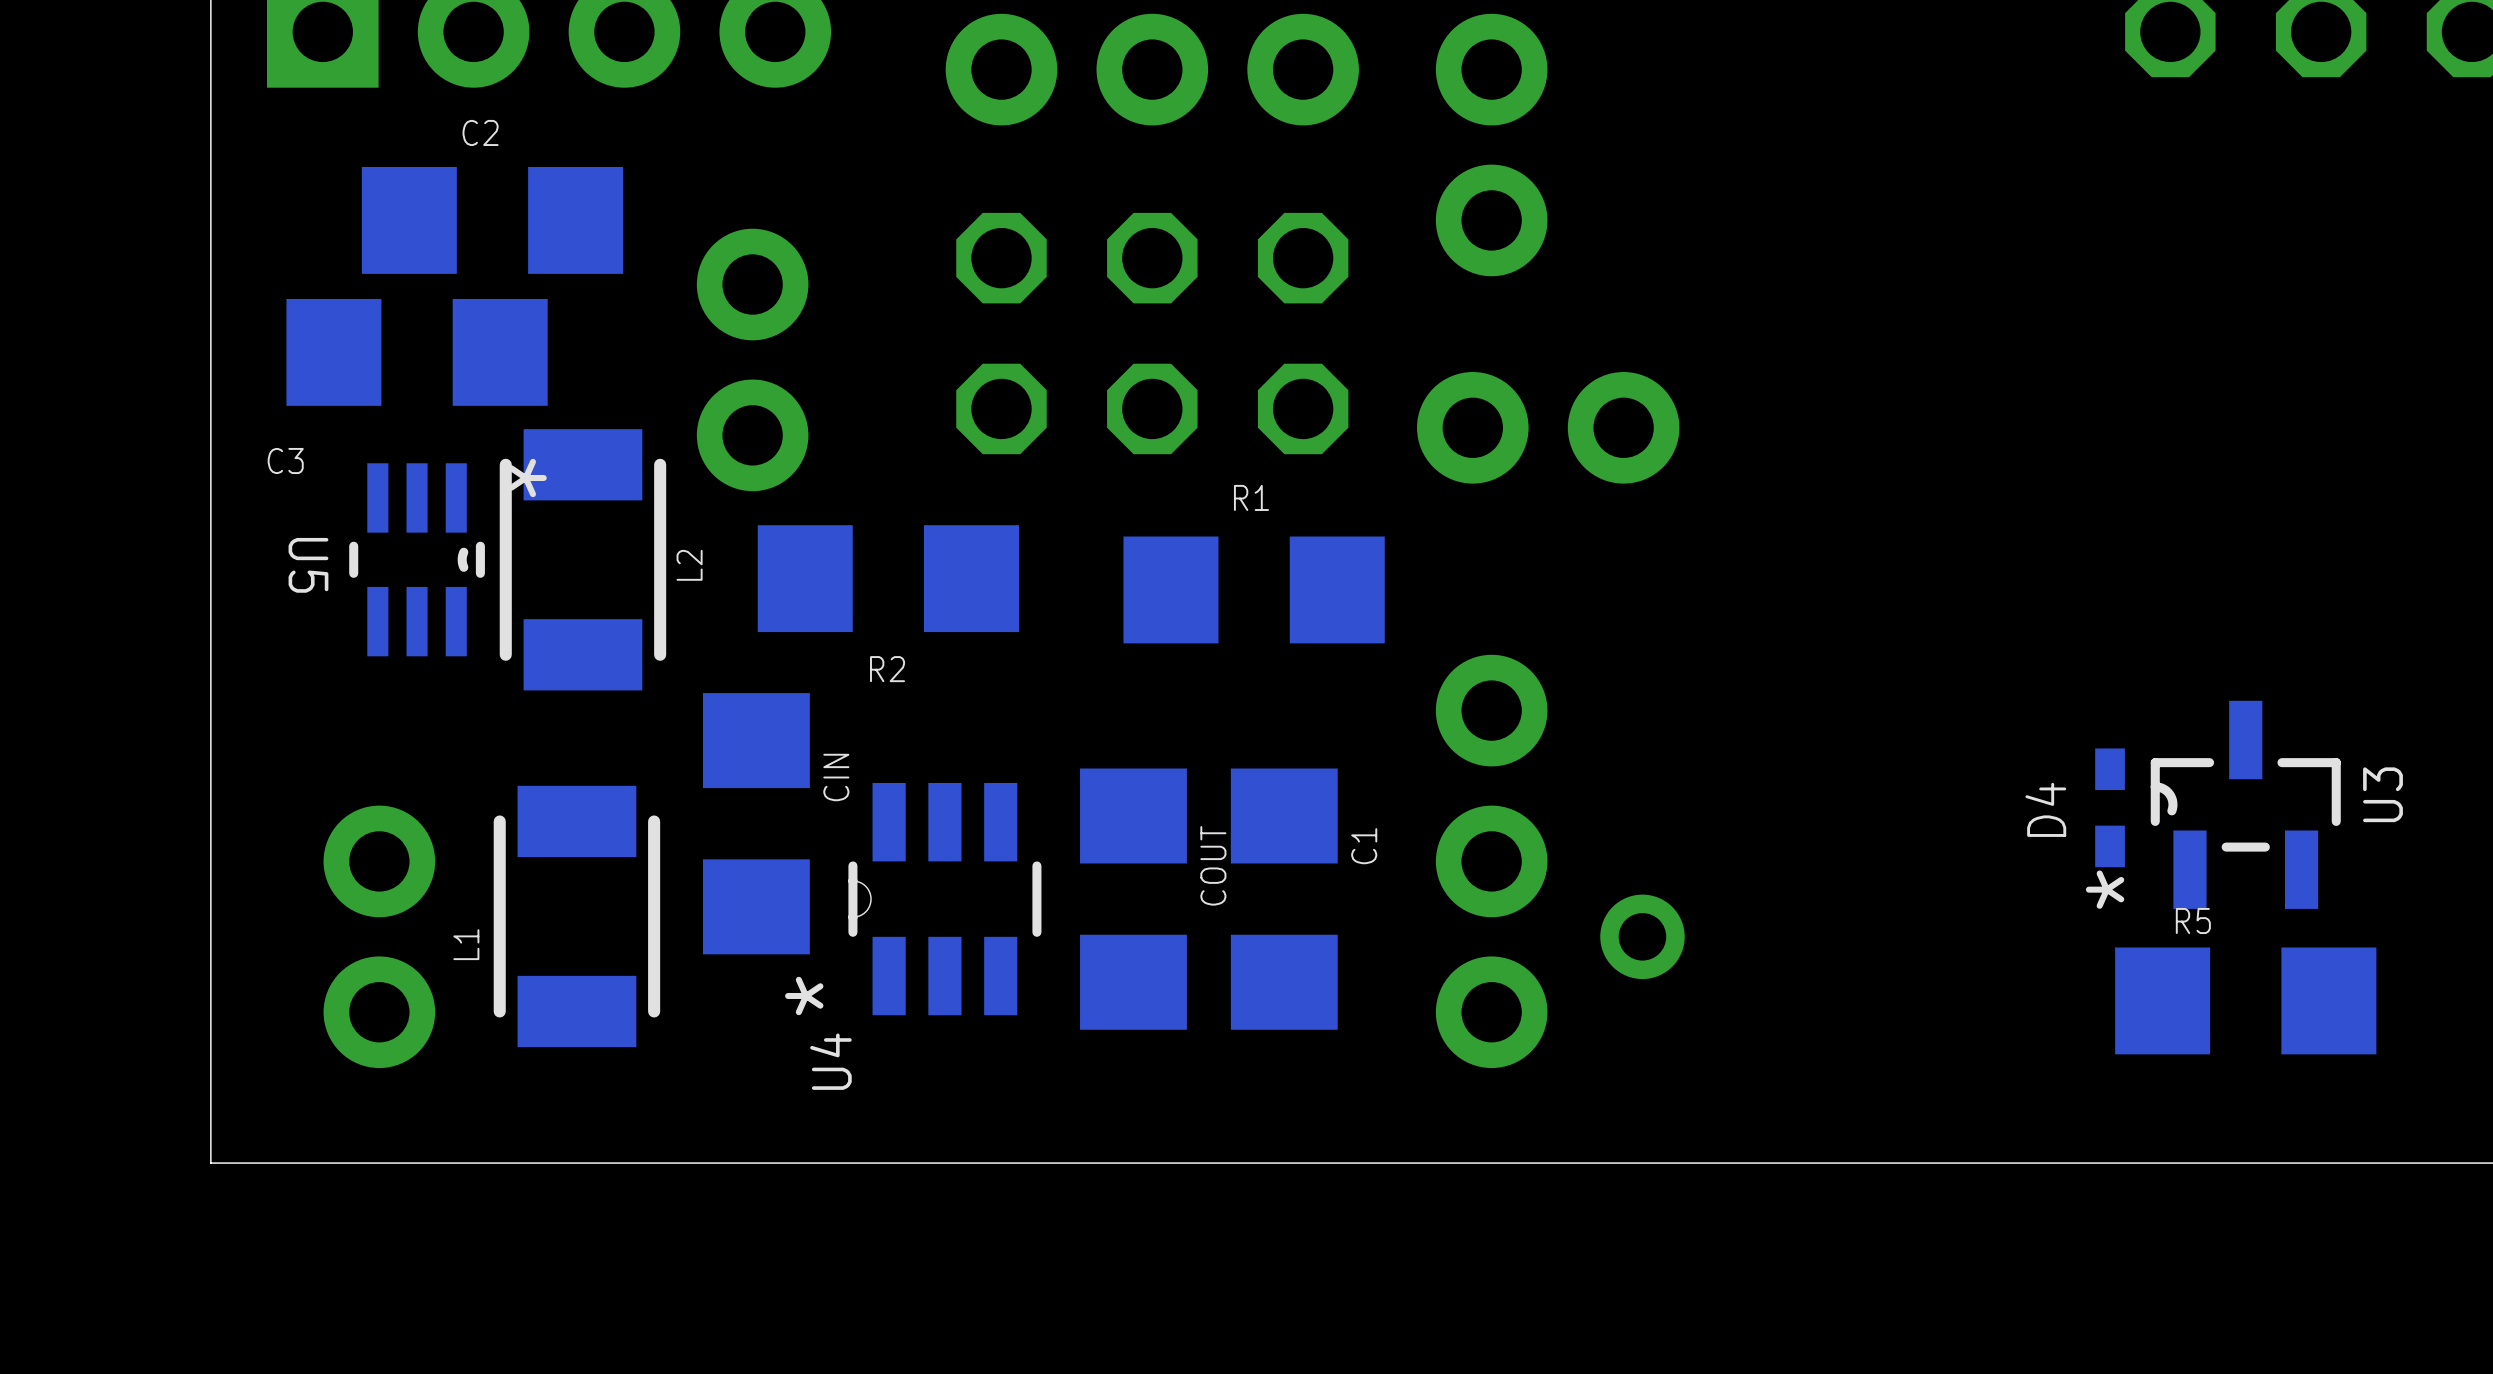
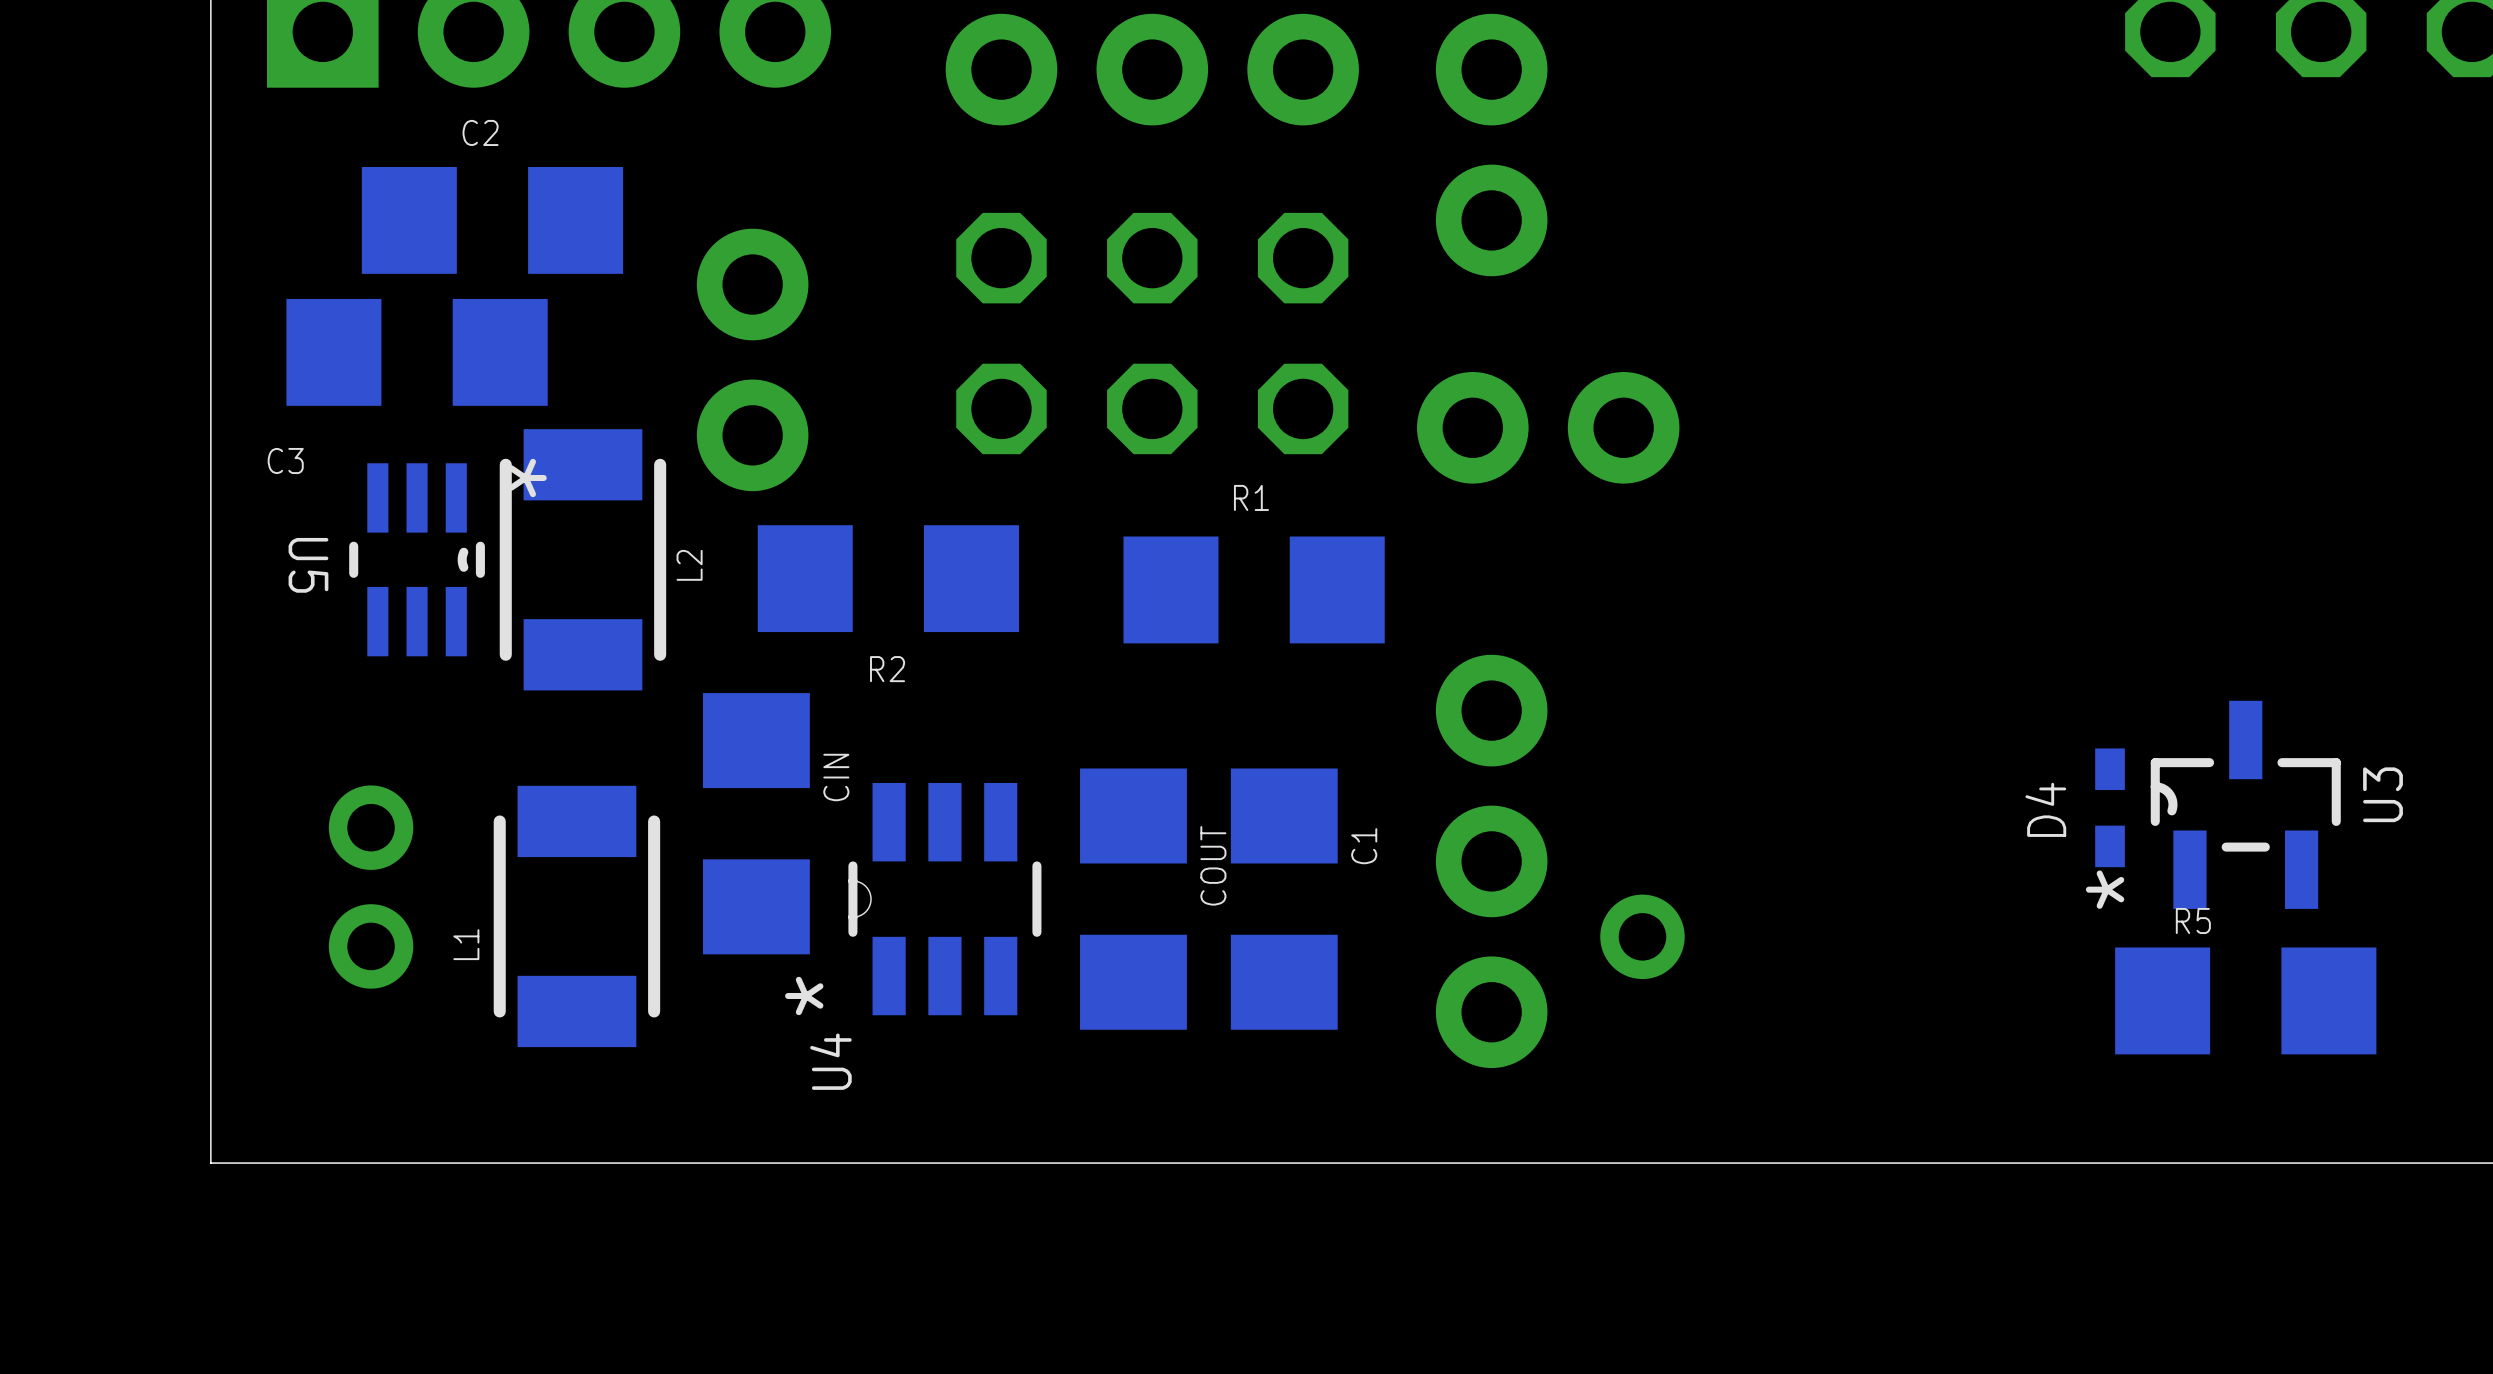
part footprint: [323, 805, 436, 1069] -> [328, 785, 414, 989]

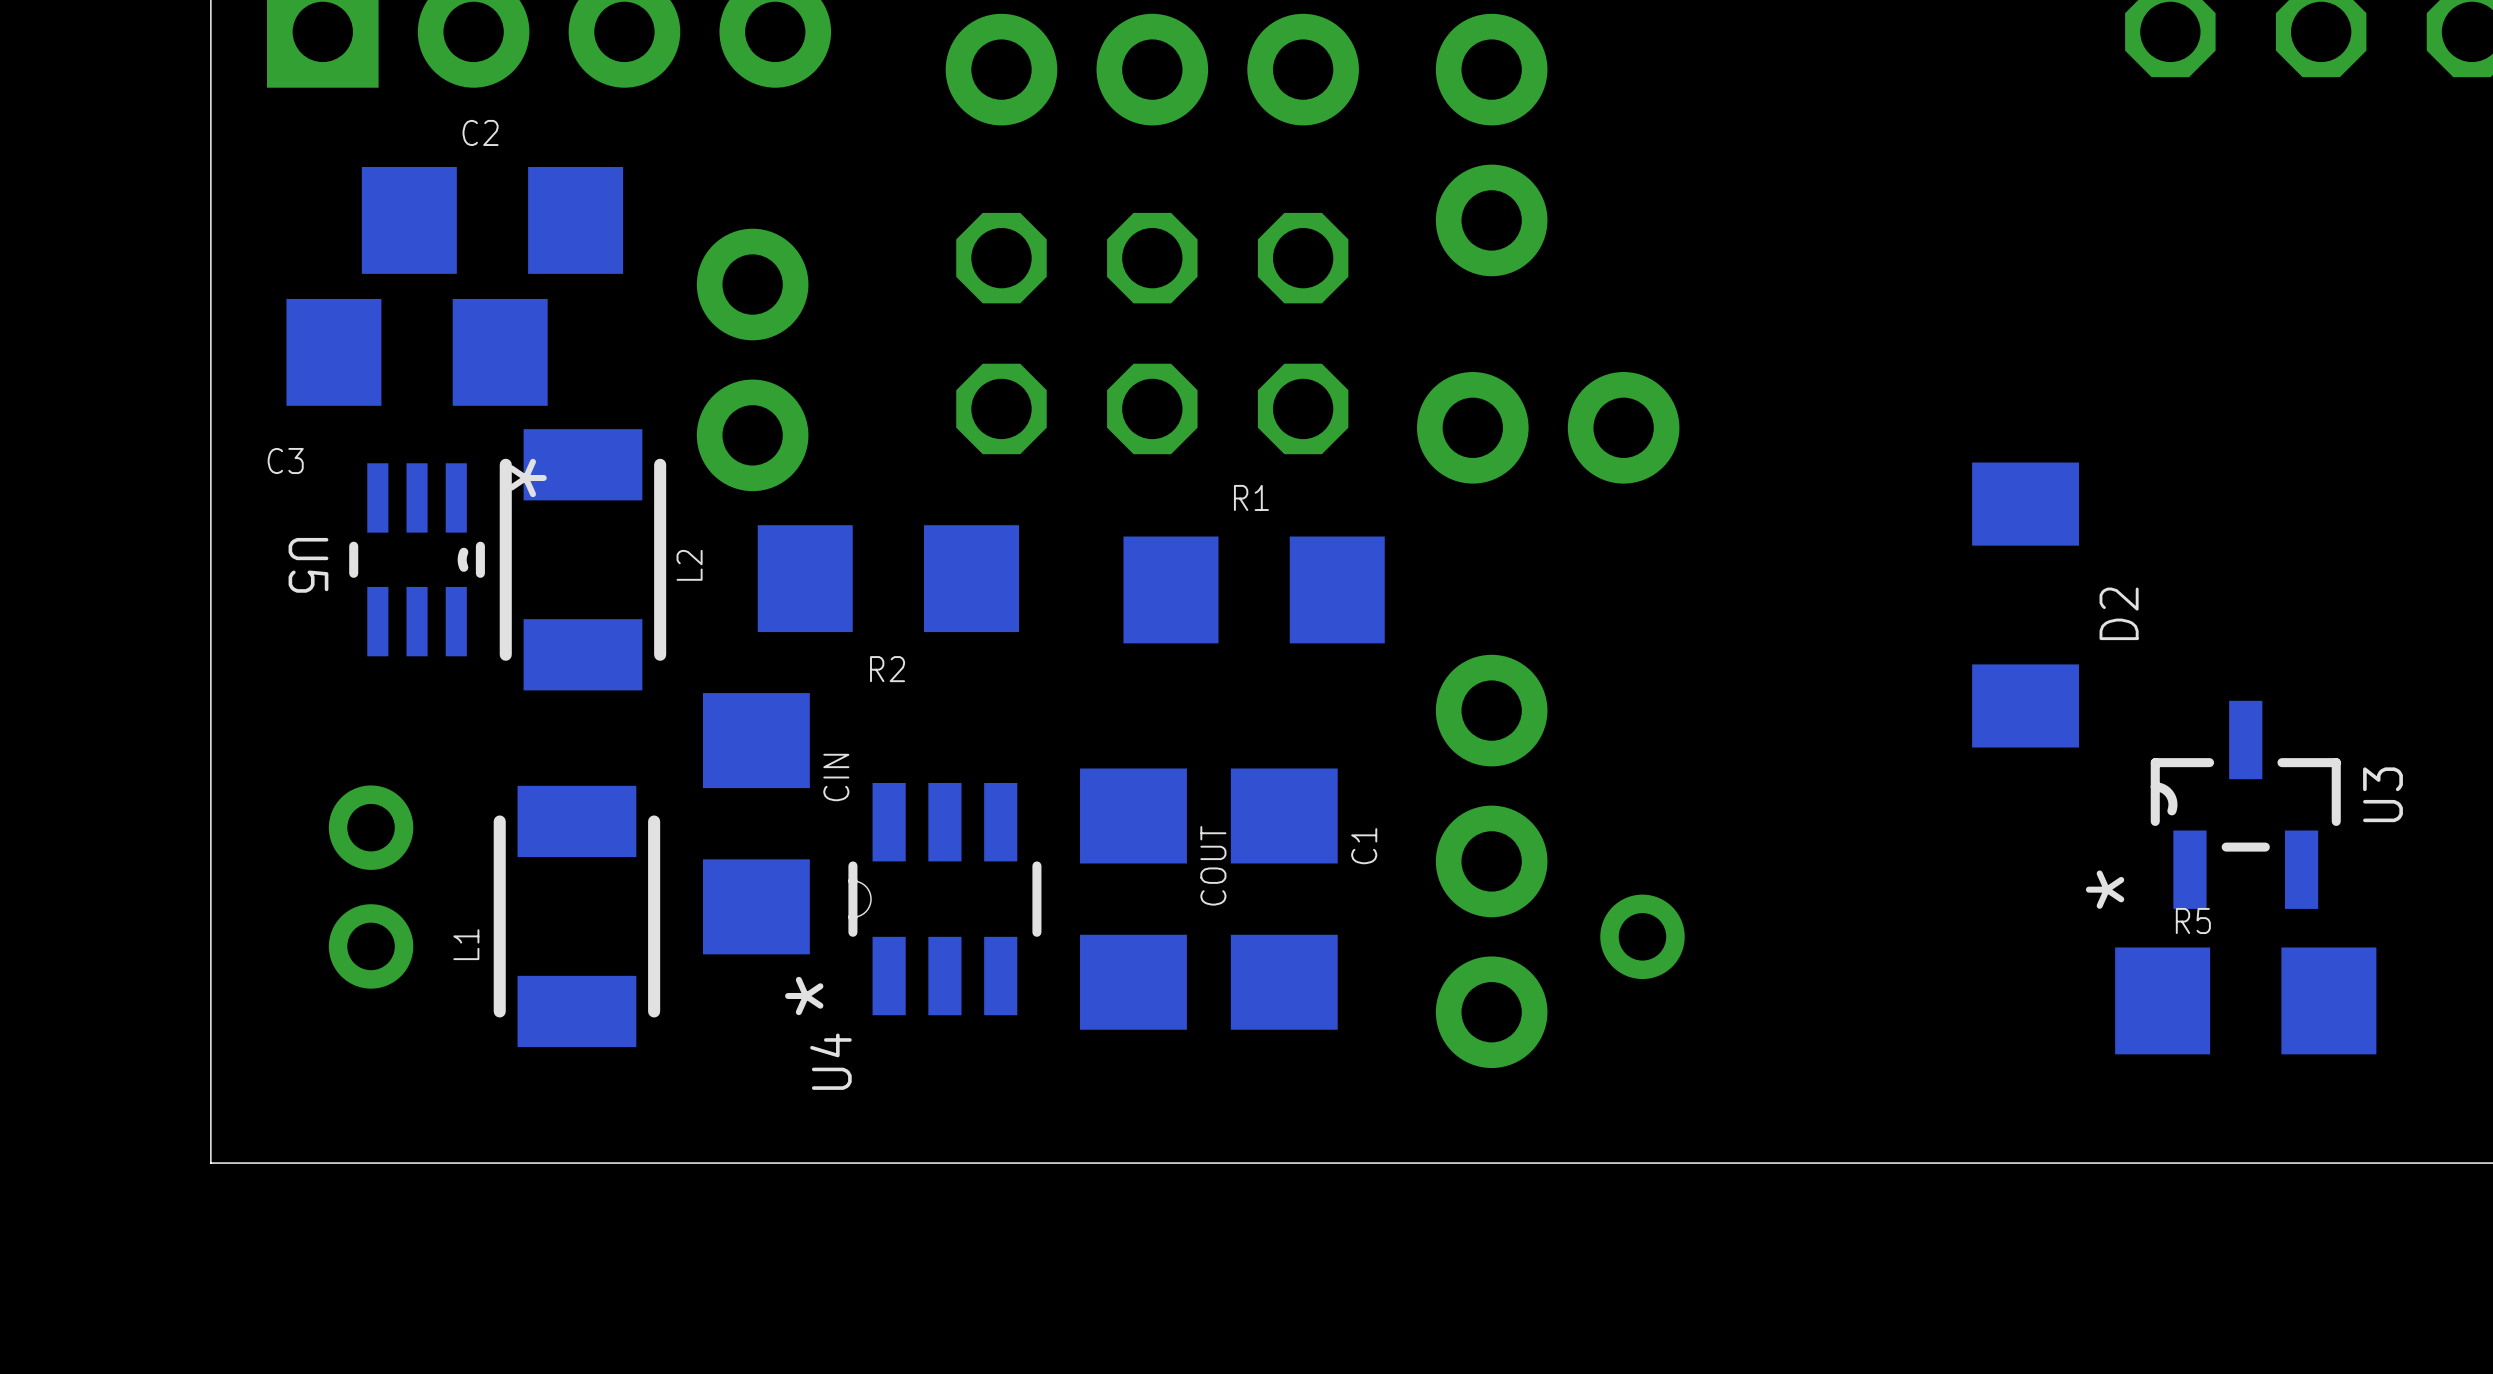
D2: none -> (2025, 605)
D4: (2110, 807) -> none

